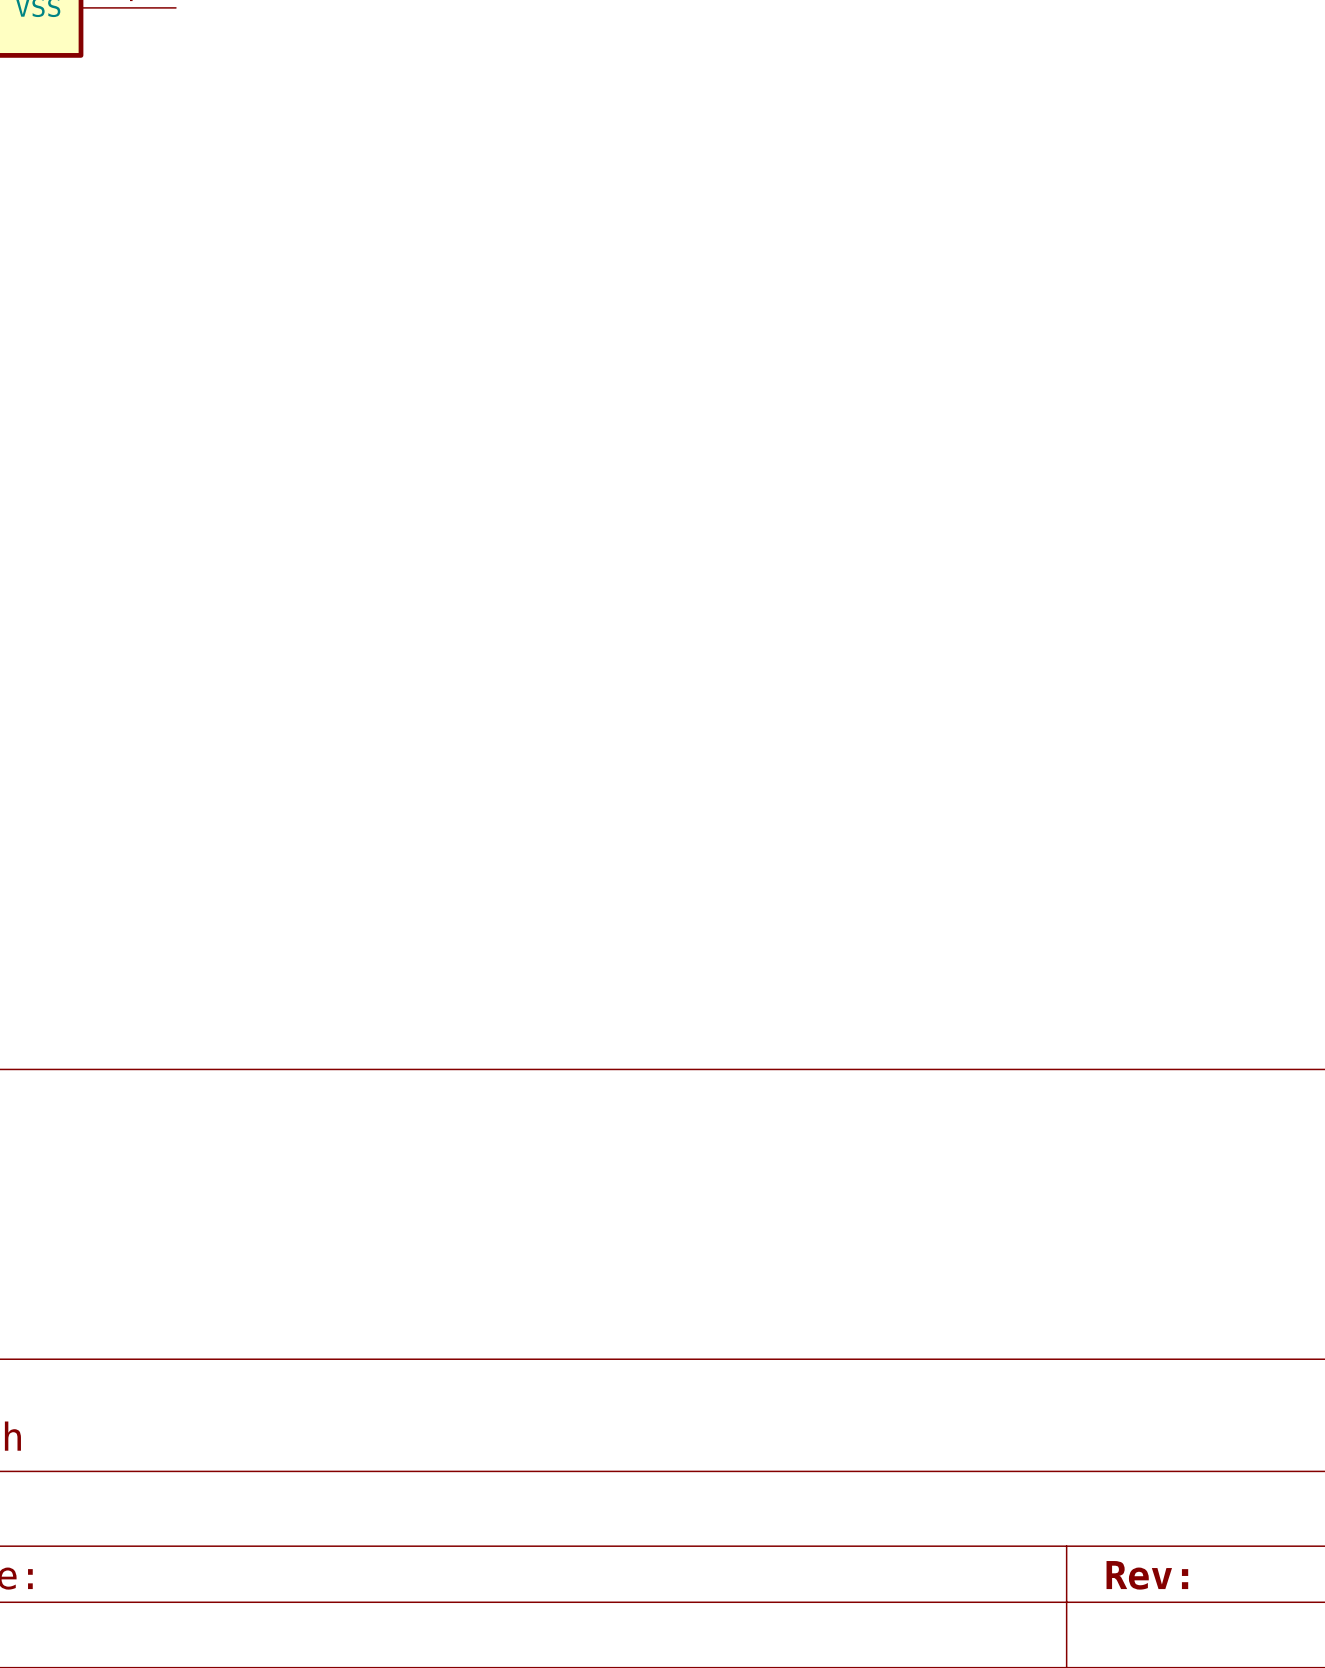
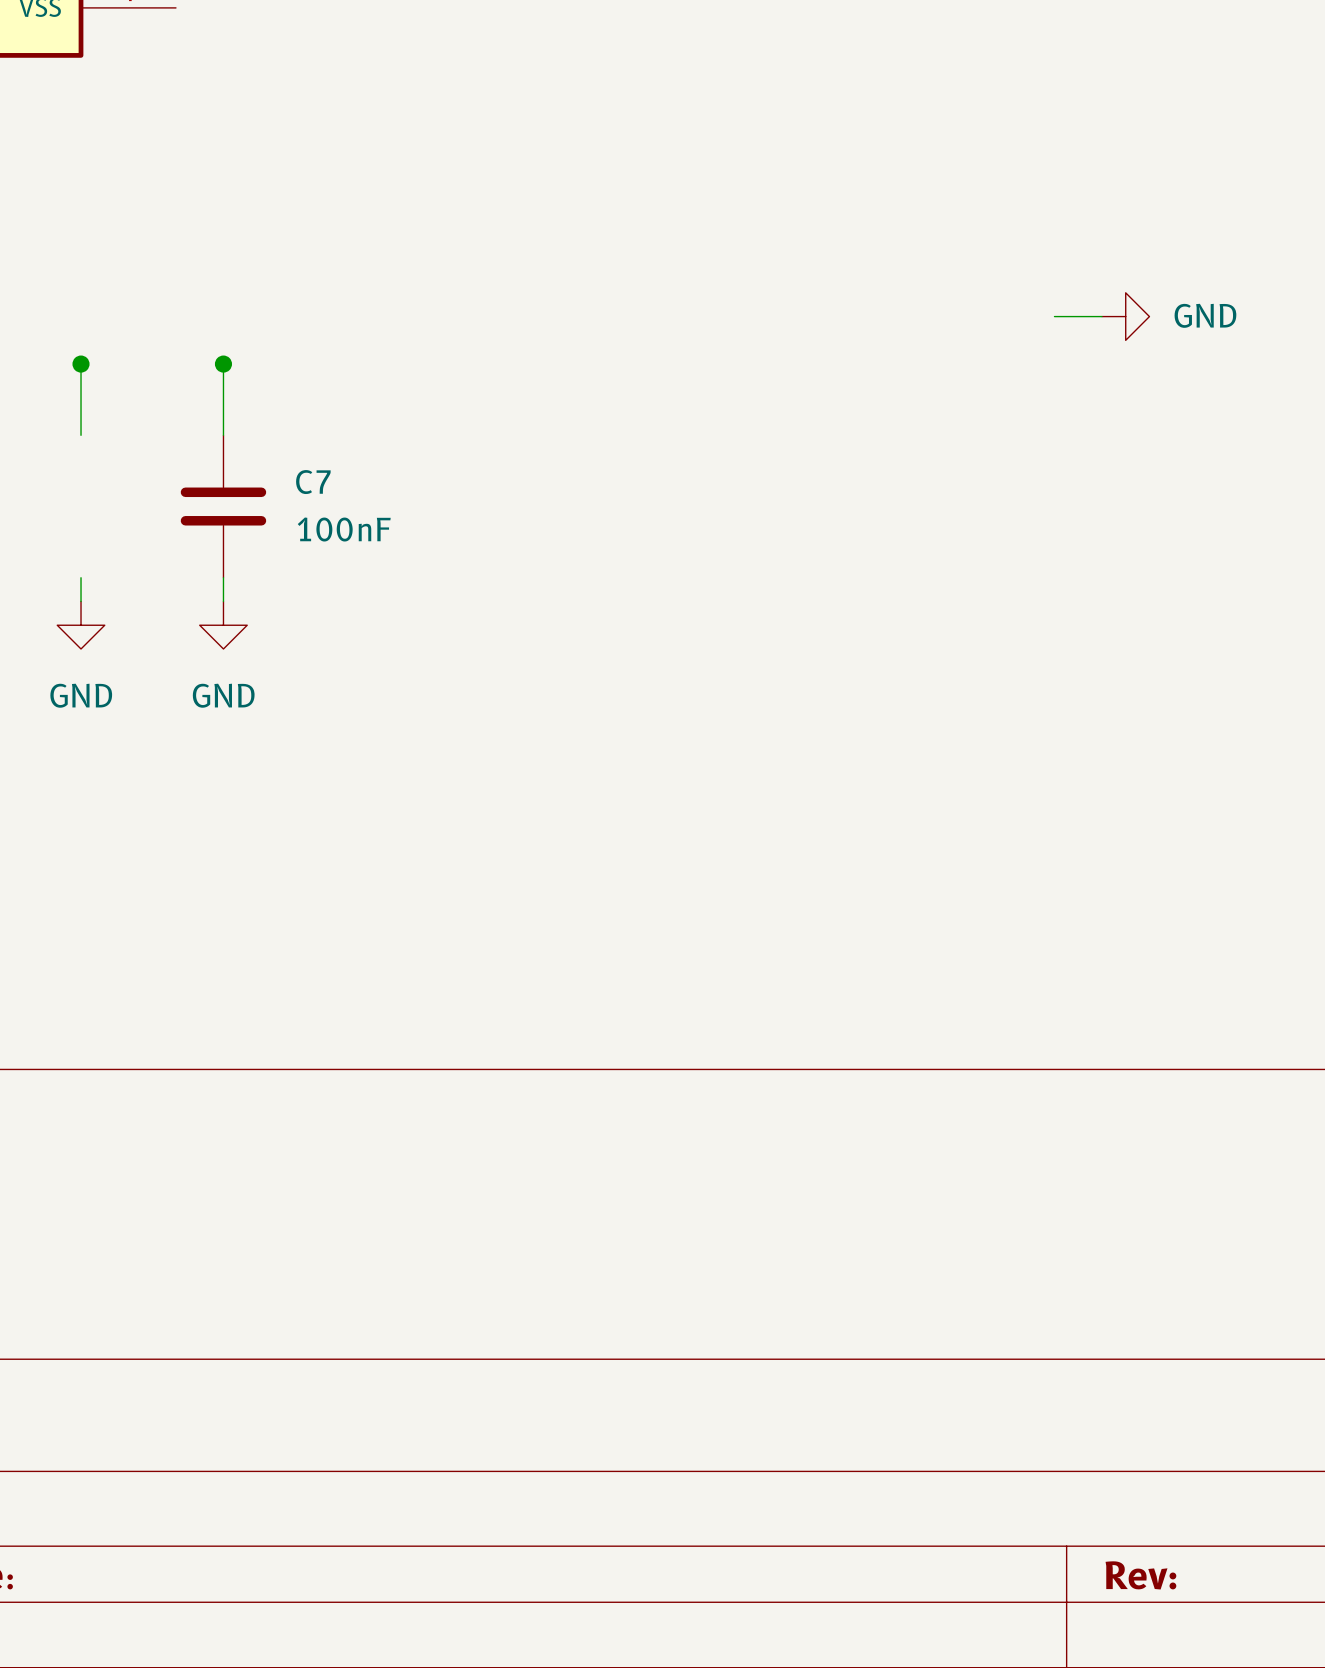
wire: none -> (1054, 316) (1101, 316)
power symbol: none -> GND (1125, 316)
wire: none -> (81, 364) (81, 435)
junction: none -> (81, 364)
wire: none -> (223, 364) (223, 435)
junction: none -> (223, 364)
C7: none -> 100nF (223, 506)
wire: none -> (81, 577) (81, 601)
wire: none -> (223, 577) (223, 601)
power symbol: none -> GND (81, 625)
power symbol: none -> GND (223, 625)

